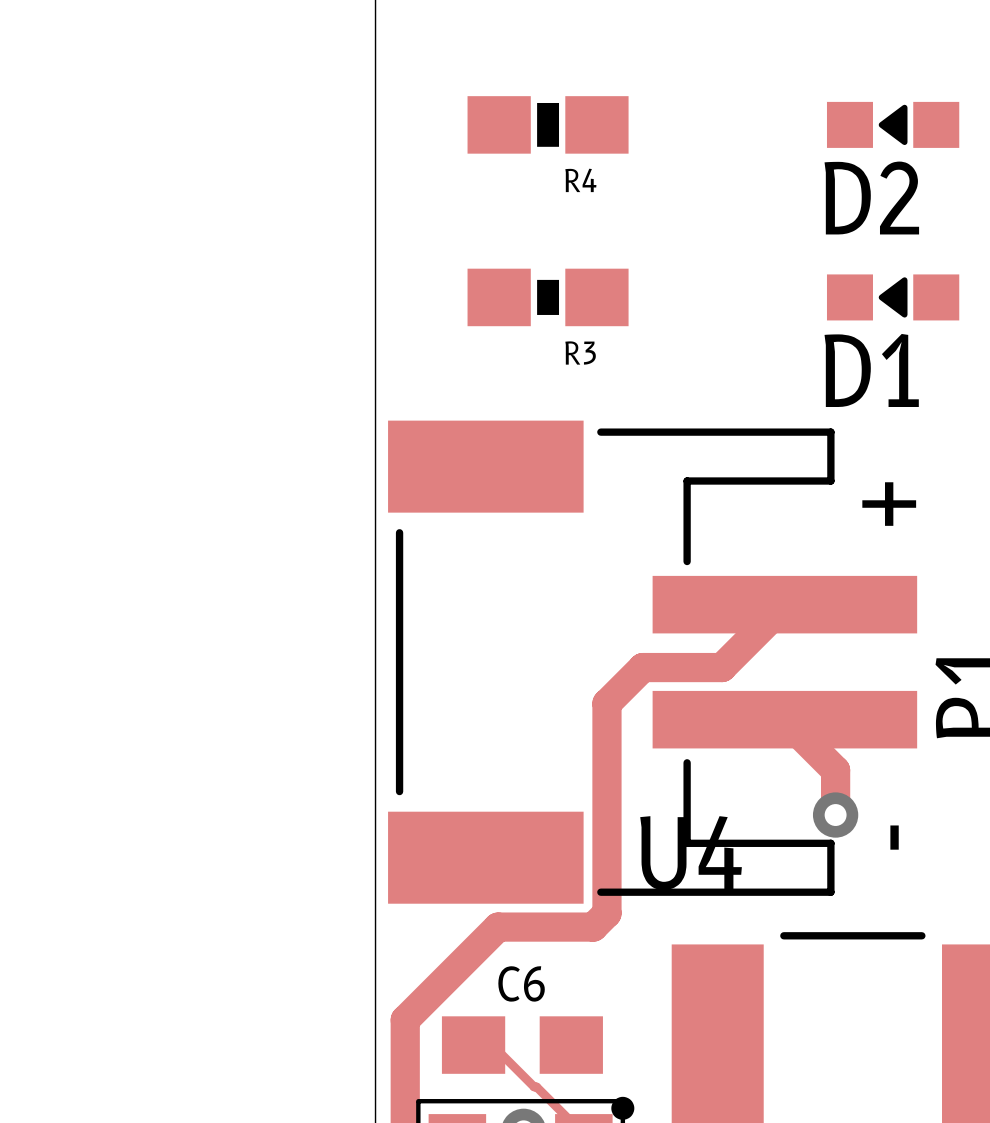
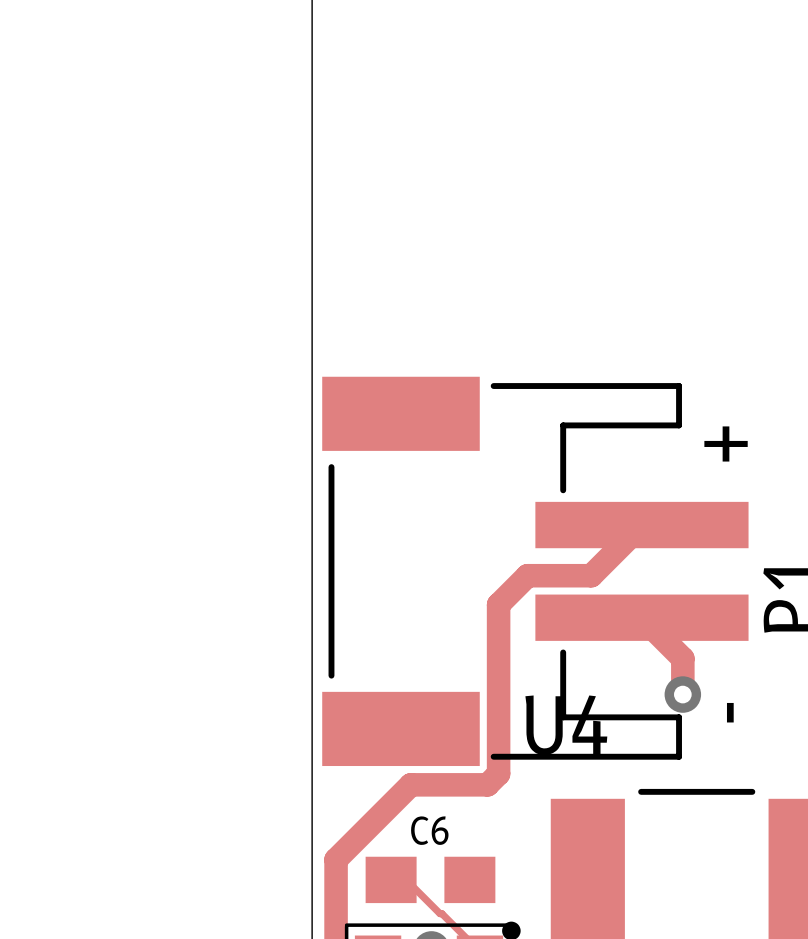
R4: (548, 124) -> none
D2: (893, 124) -> none
R3: (548, 297) -> none
D1: (893, 297) -> none

